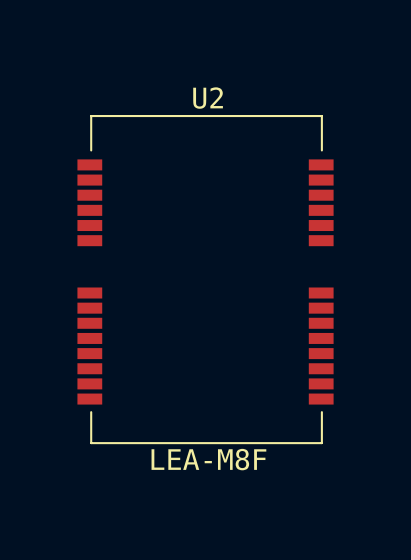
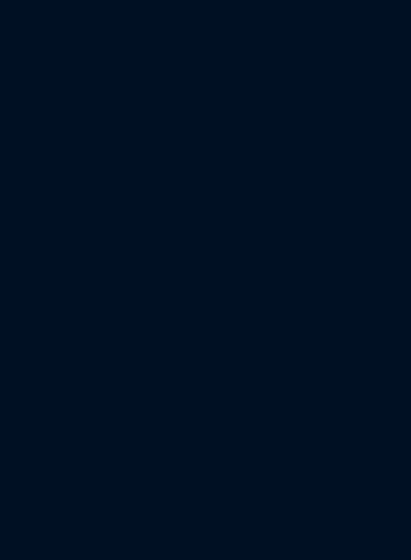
U2: LEA-M8F (205, 279) -> none

